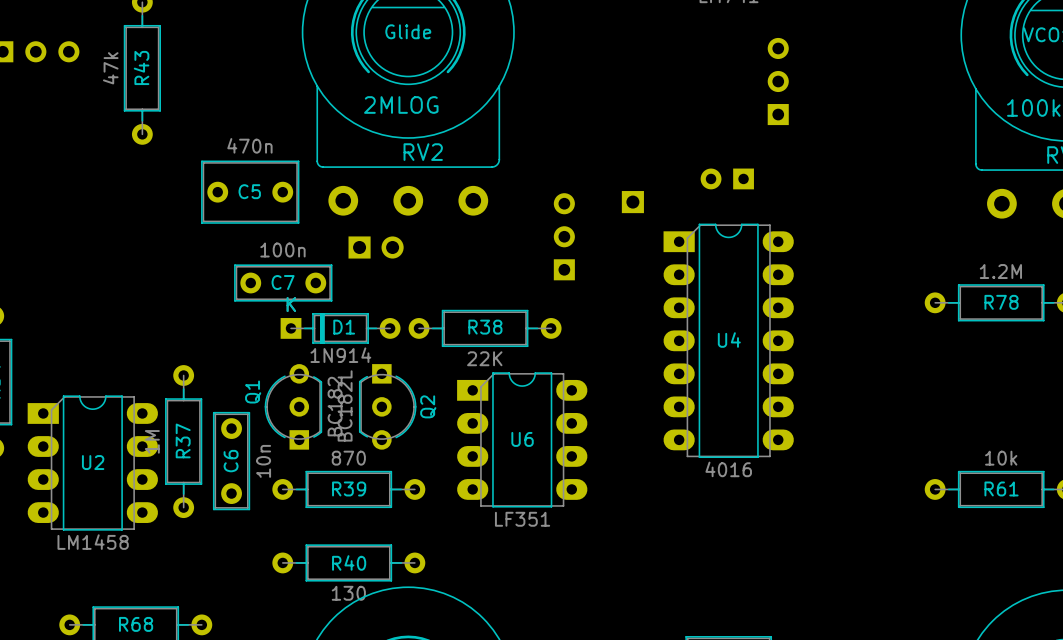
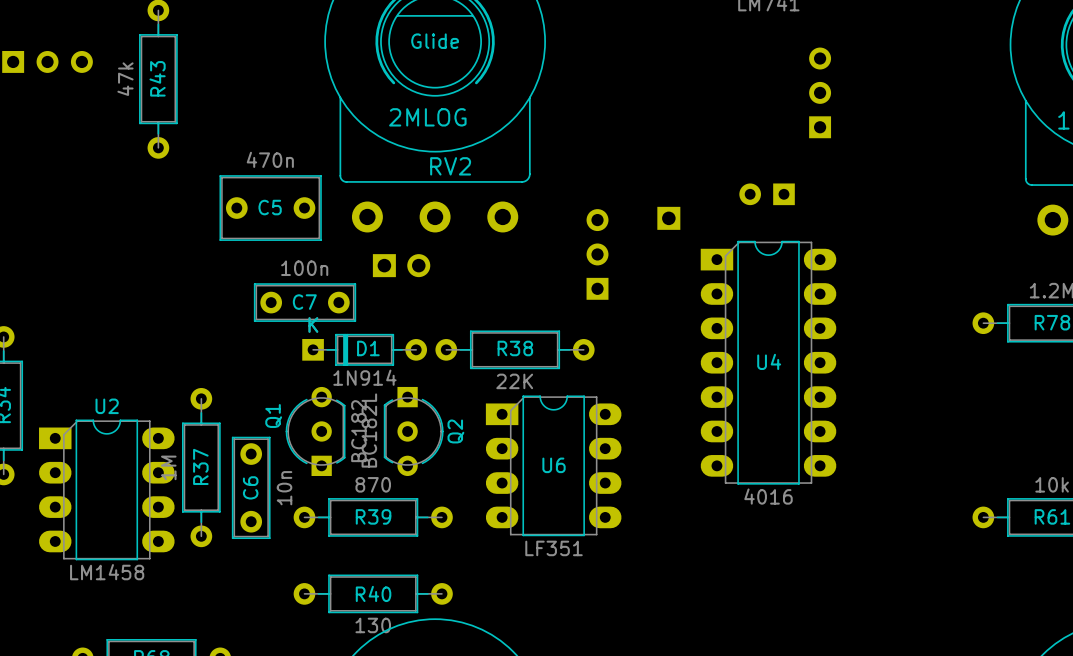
U2 name position: U2 (93, 462) -> U2 (107, 406)

